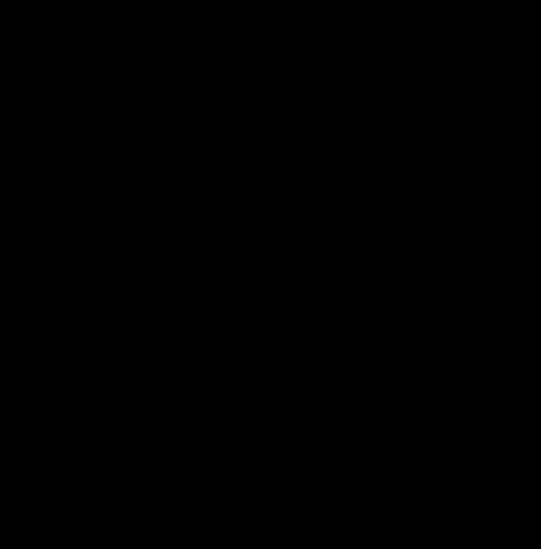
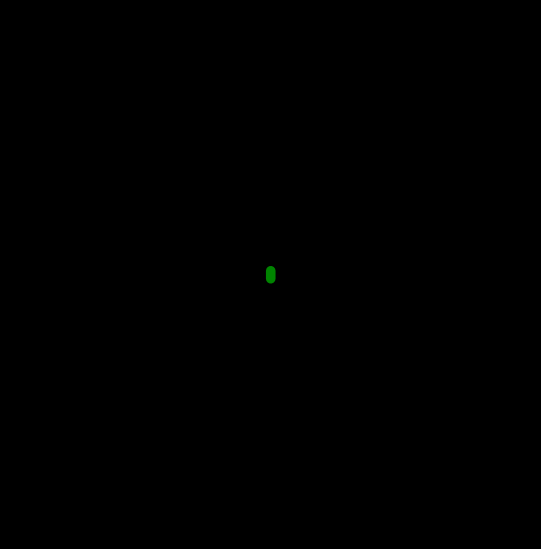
bottom track: none -> (270, 270) (270, 278)

